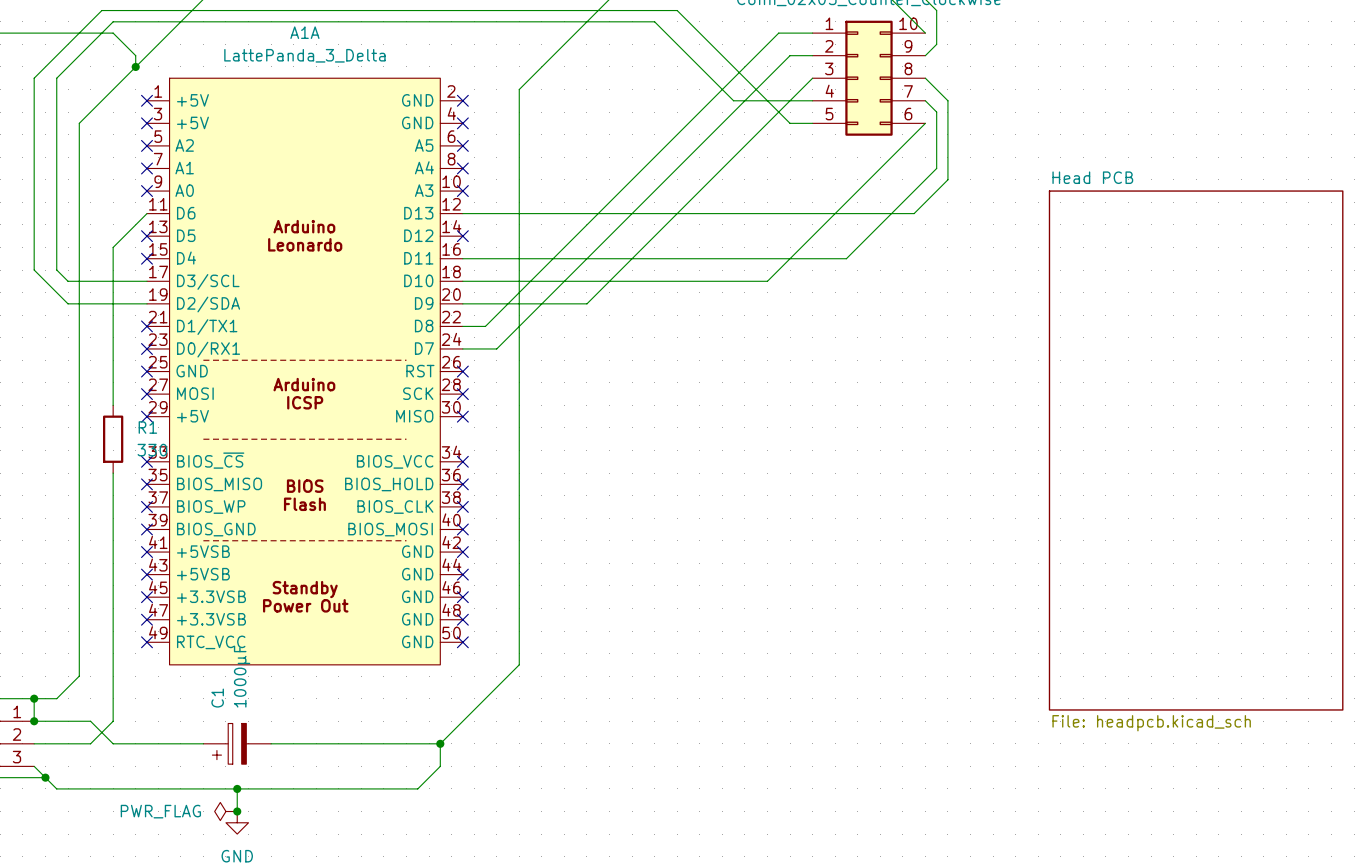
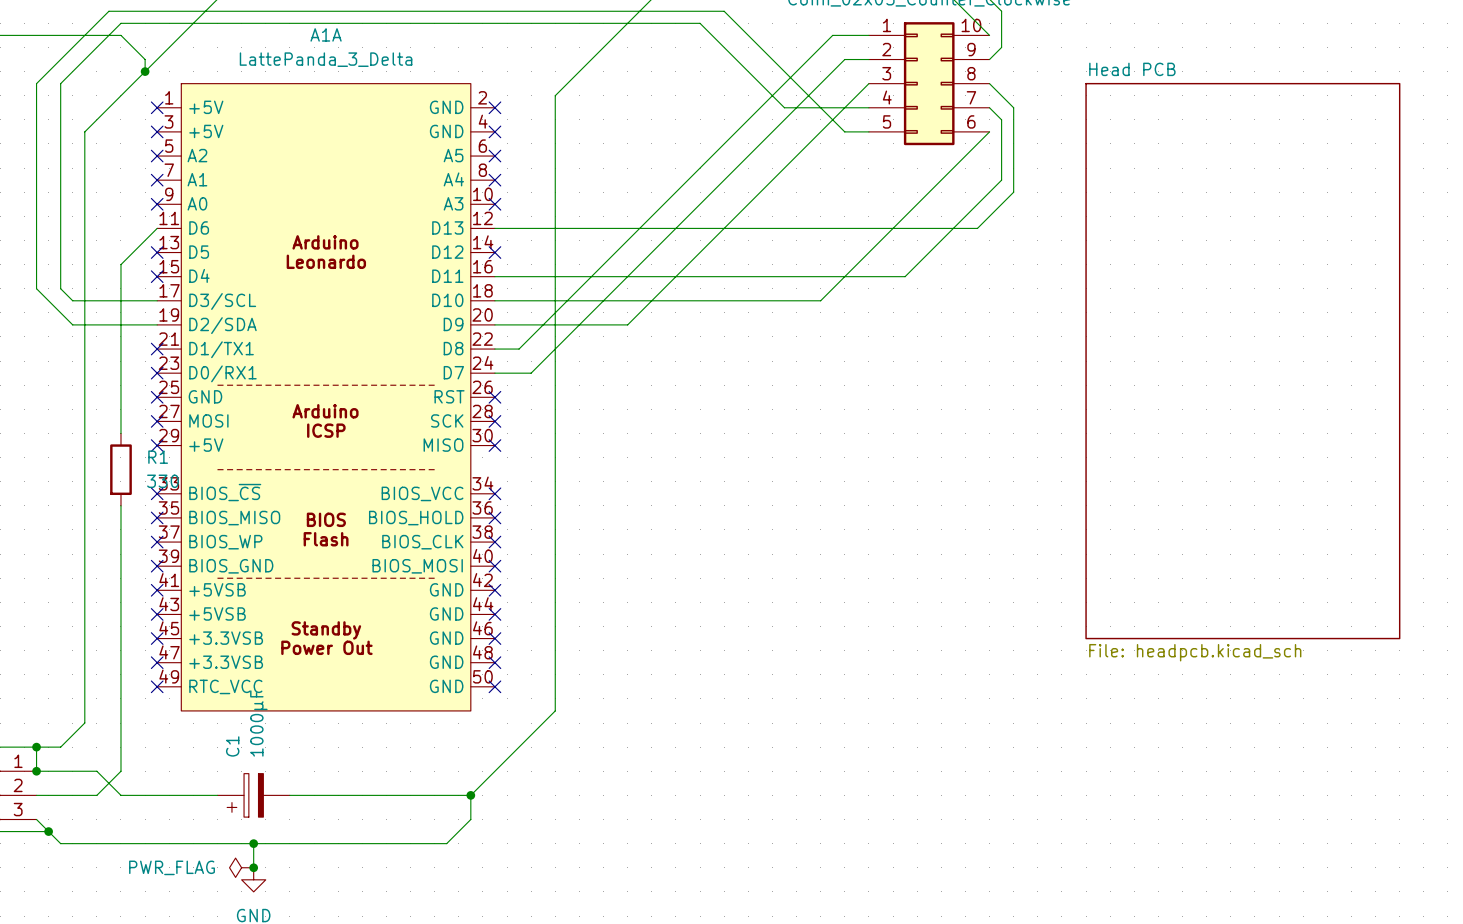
sheet Head PCB position: (1196, 450) -> (1242, 361)

